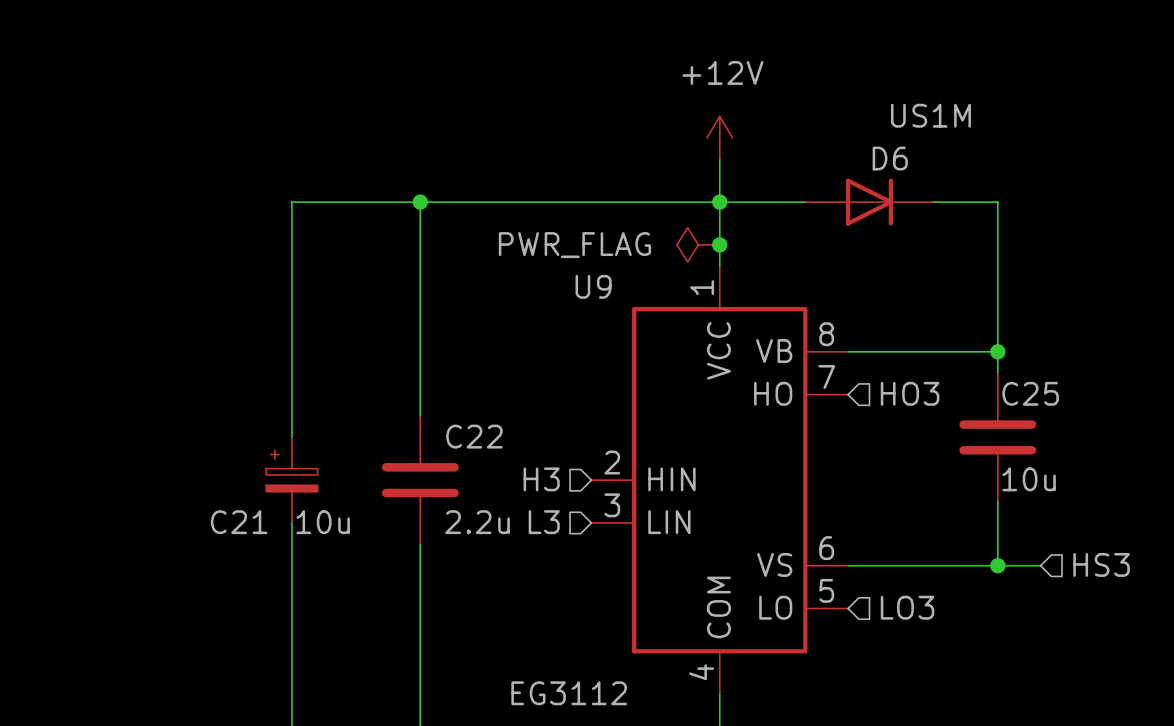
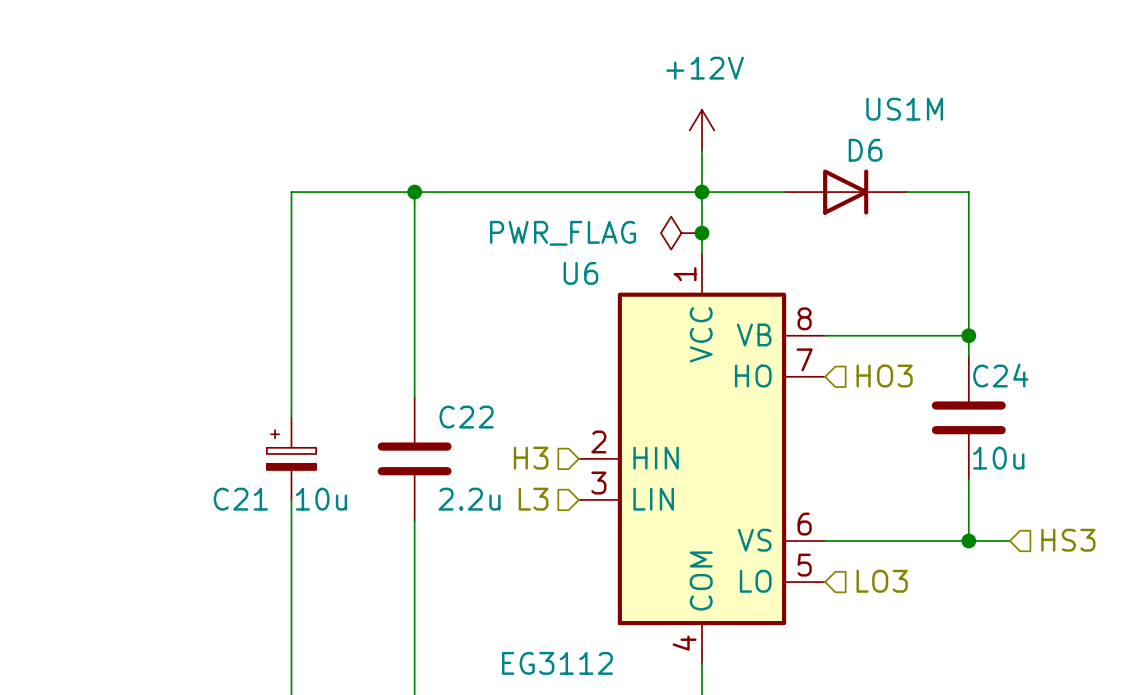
U9 name: U9 (593, 286) -> U6 (580, 273)
C25 name: C25 (1030, 393) -> C24 (1000, 375)

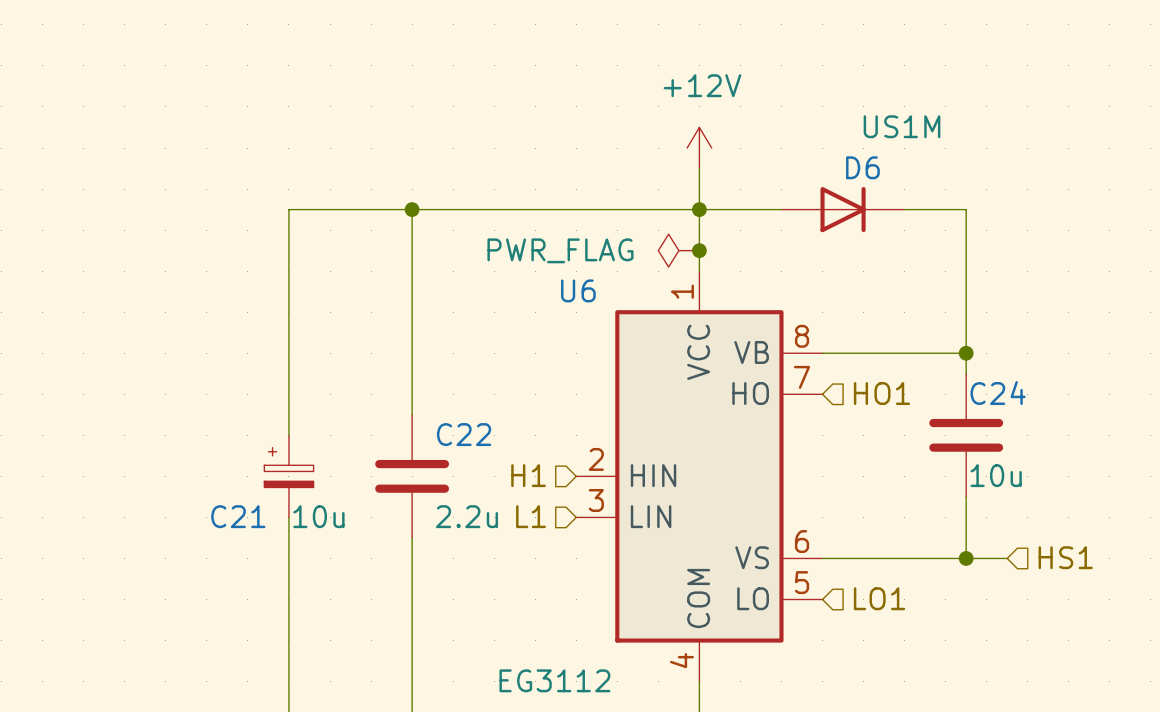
hierarchical label: HO3 (884, 376) -> HO1 (881, 393)
hierarchical label: H3 (531, 458) -> H1 (528, 475)
hierarchical label: L3 (533, 499) -> L1 (531, 516)
hierarchical label: HS3 (1068, 540) -> HS1 (1065, 557)
hierarchical label: LO3 (882, 581) -> LO1 (879, 598)

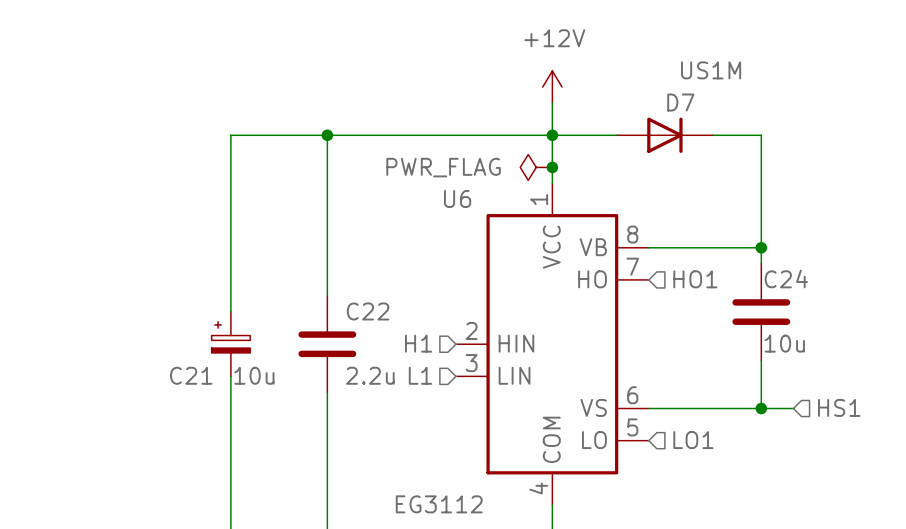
D6 name: D6 (862, 167) -> D7 (680, 102)

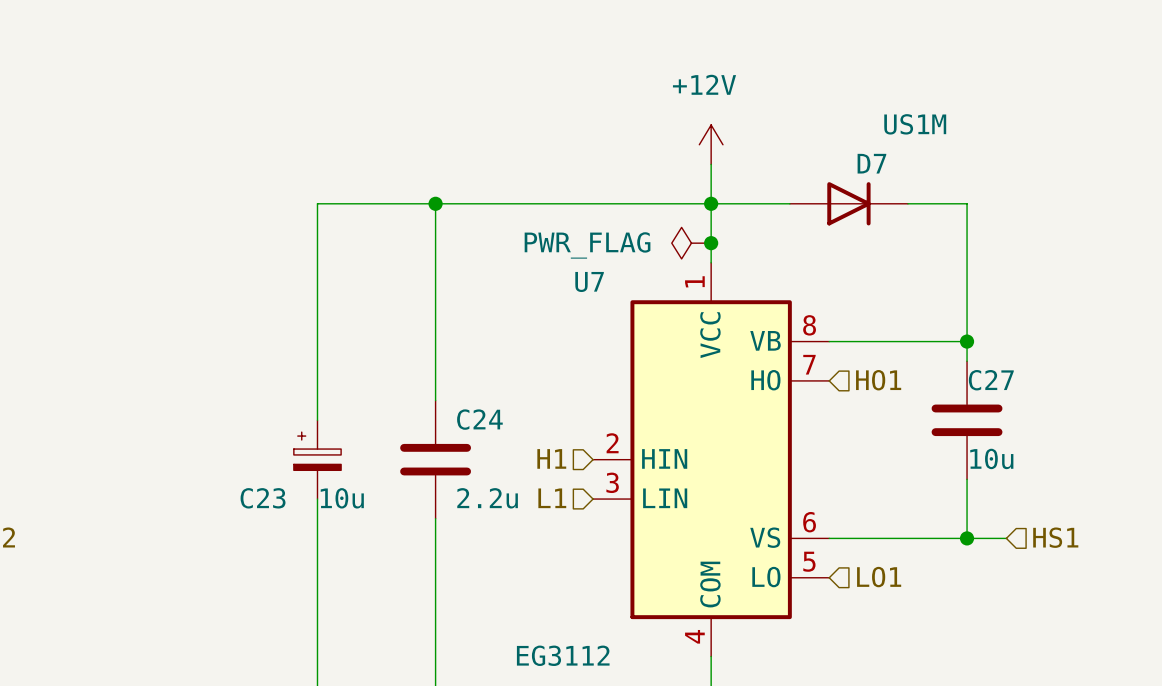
U6 name: U6 (457, 198) -> U7 (589, 281)
C24 name: C24 (786, 278) -> C27 (991, 380)
C22 name: C22 (368, 311) -> C24 (479, 419)
C21 name: C21 (191, 375) -> C23 (263, 498)

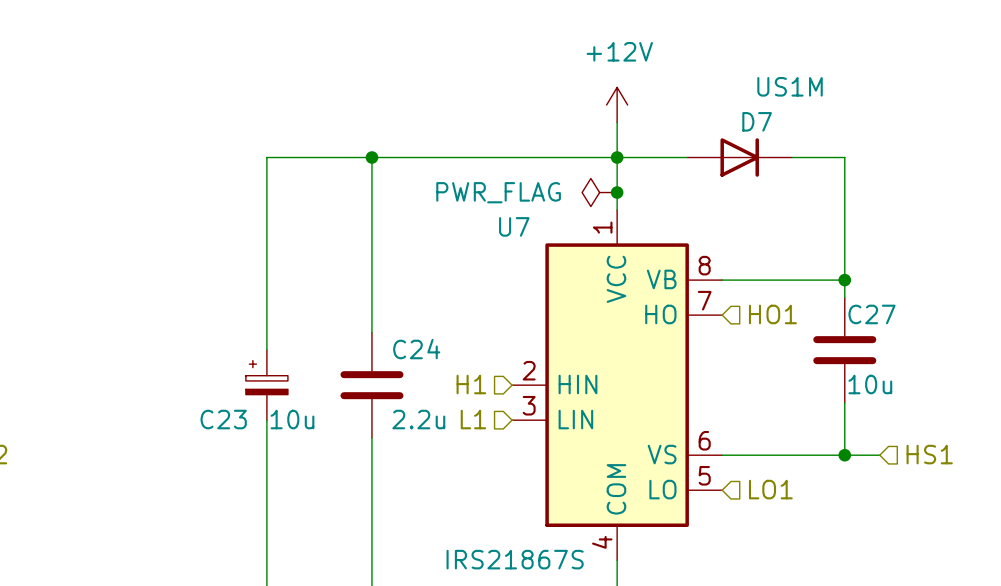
U7 value: EG3112 (563, 655) -> IRS21867S (515, 559)

